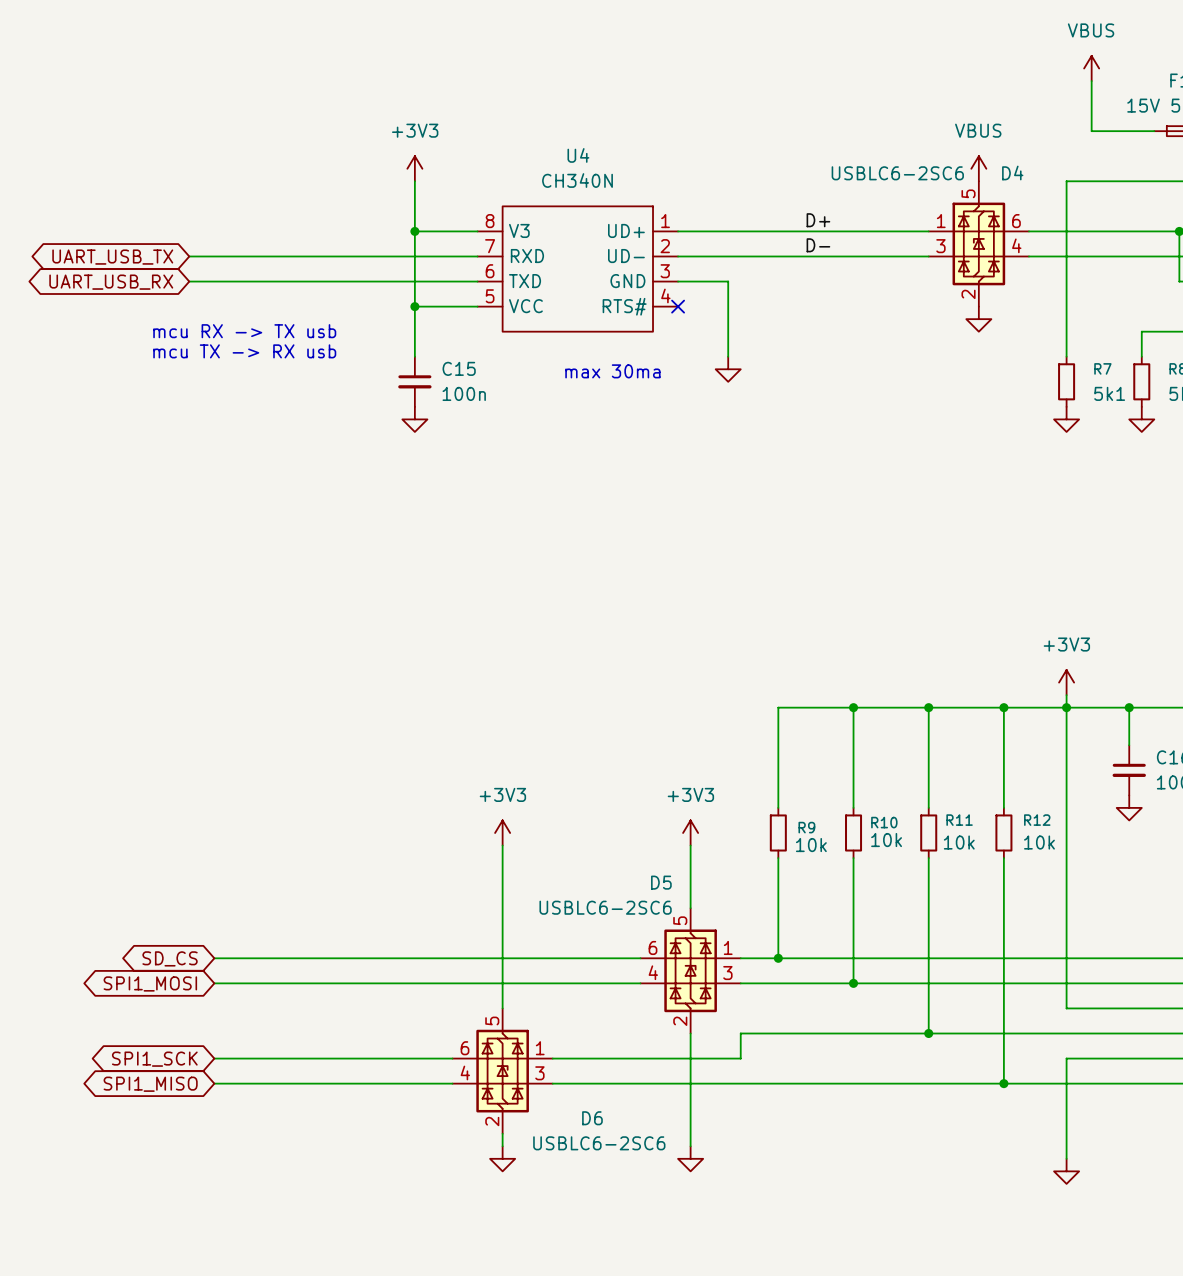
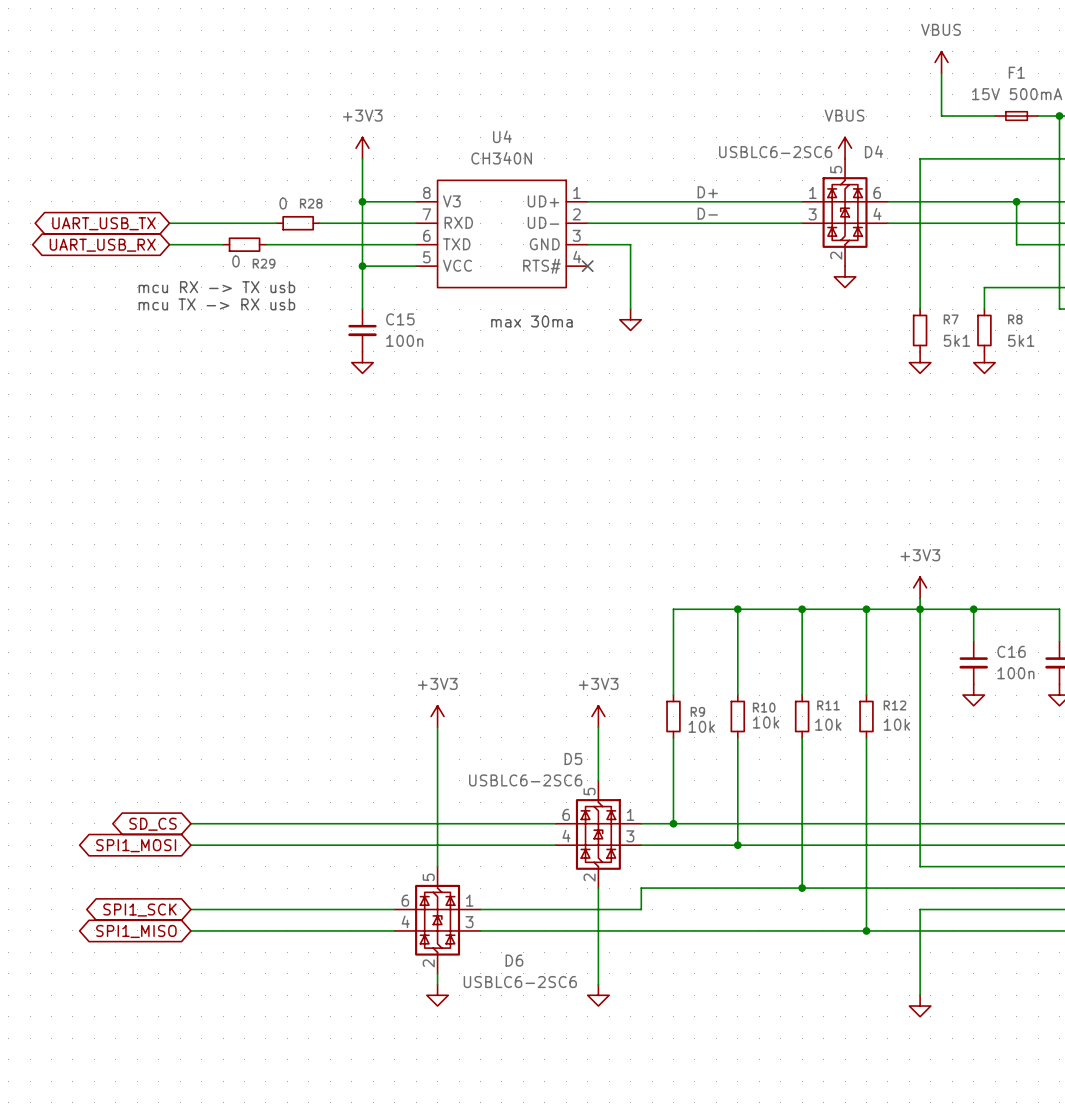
wire: (314, 256) (364, 256) -> none
R28: none -> 0 (298, 223)
wire: (251, 281) (302, 281) -> none
R29: none -> 0 (244, 244)

